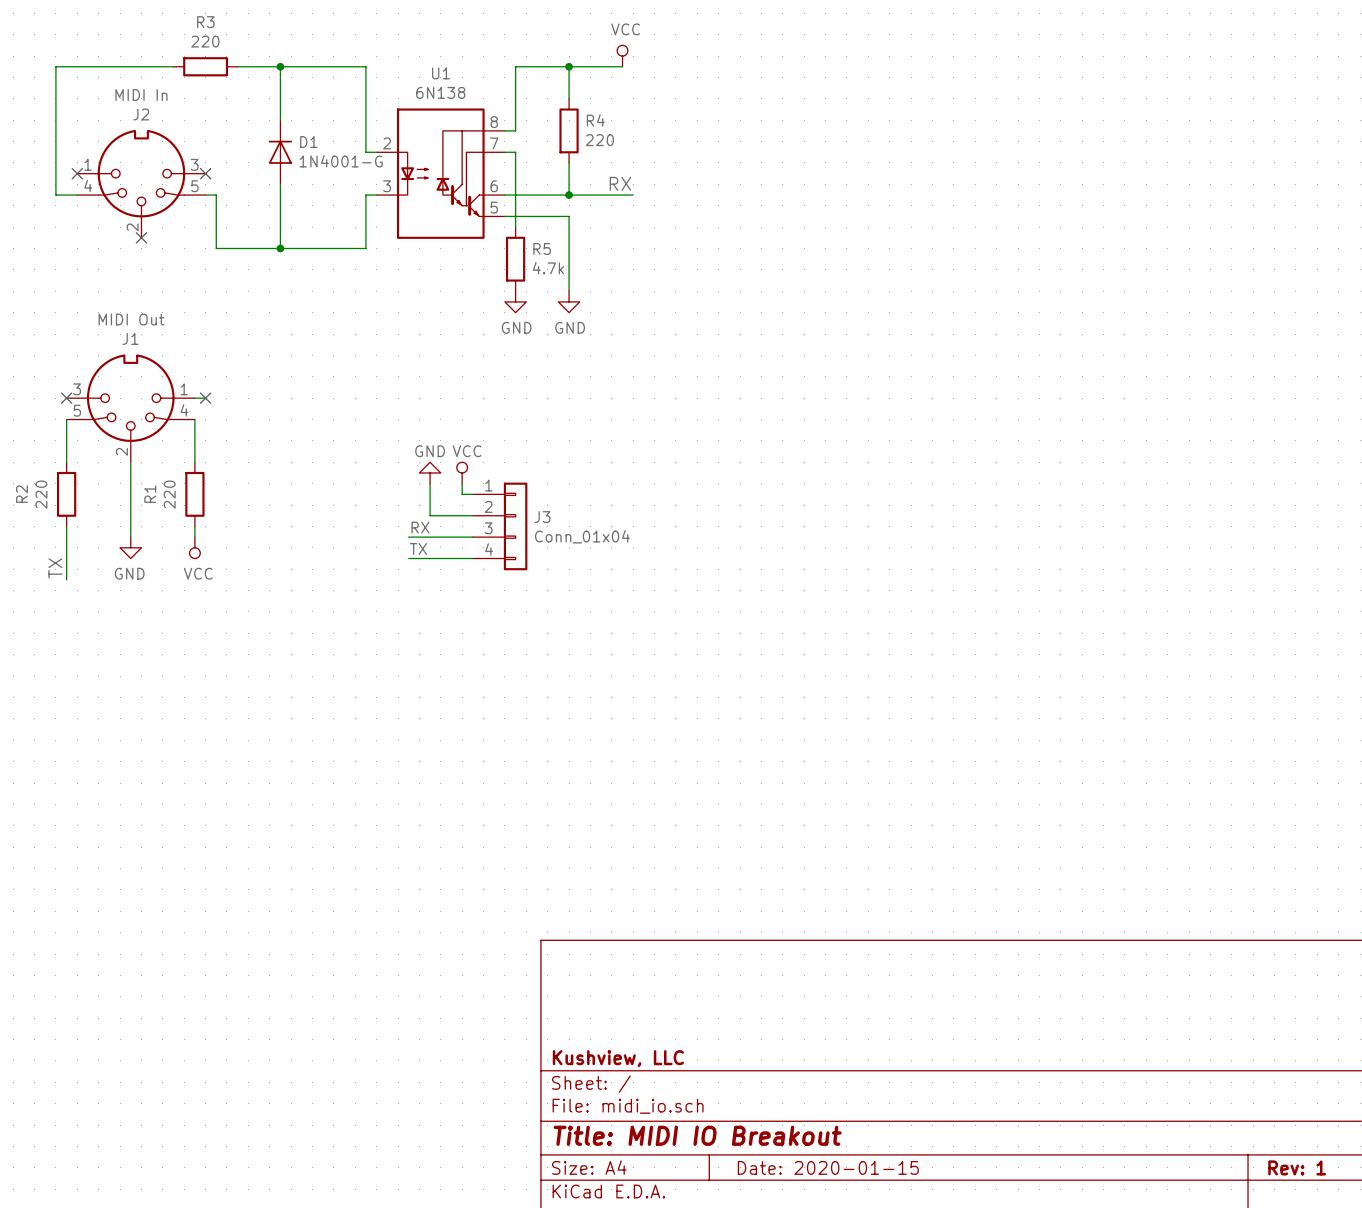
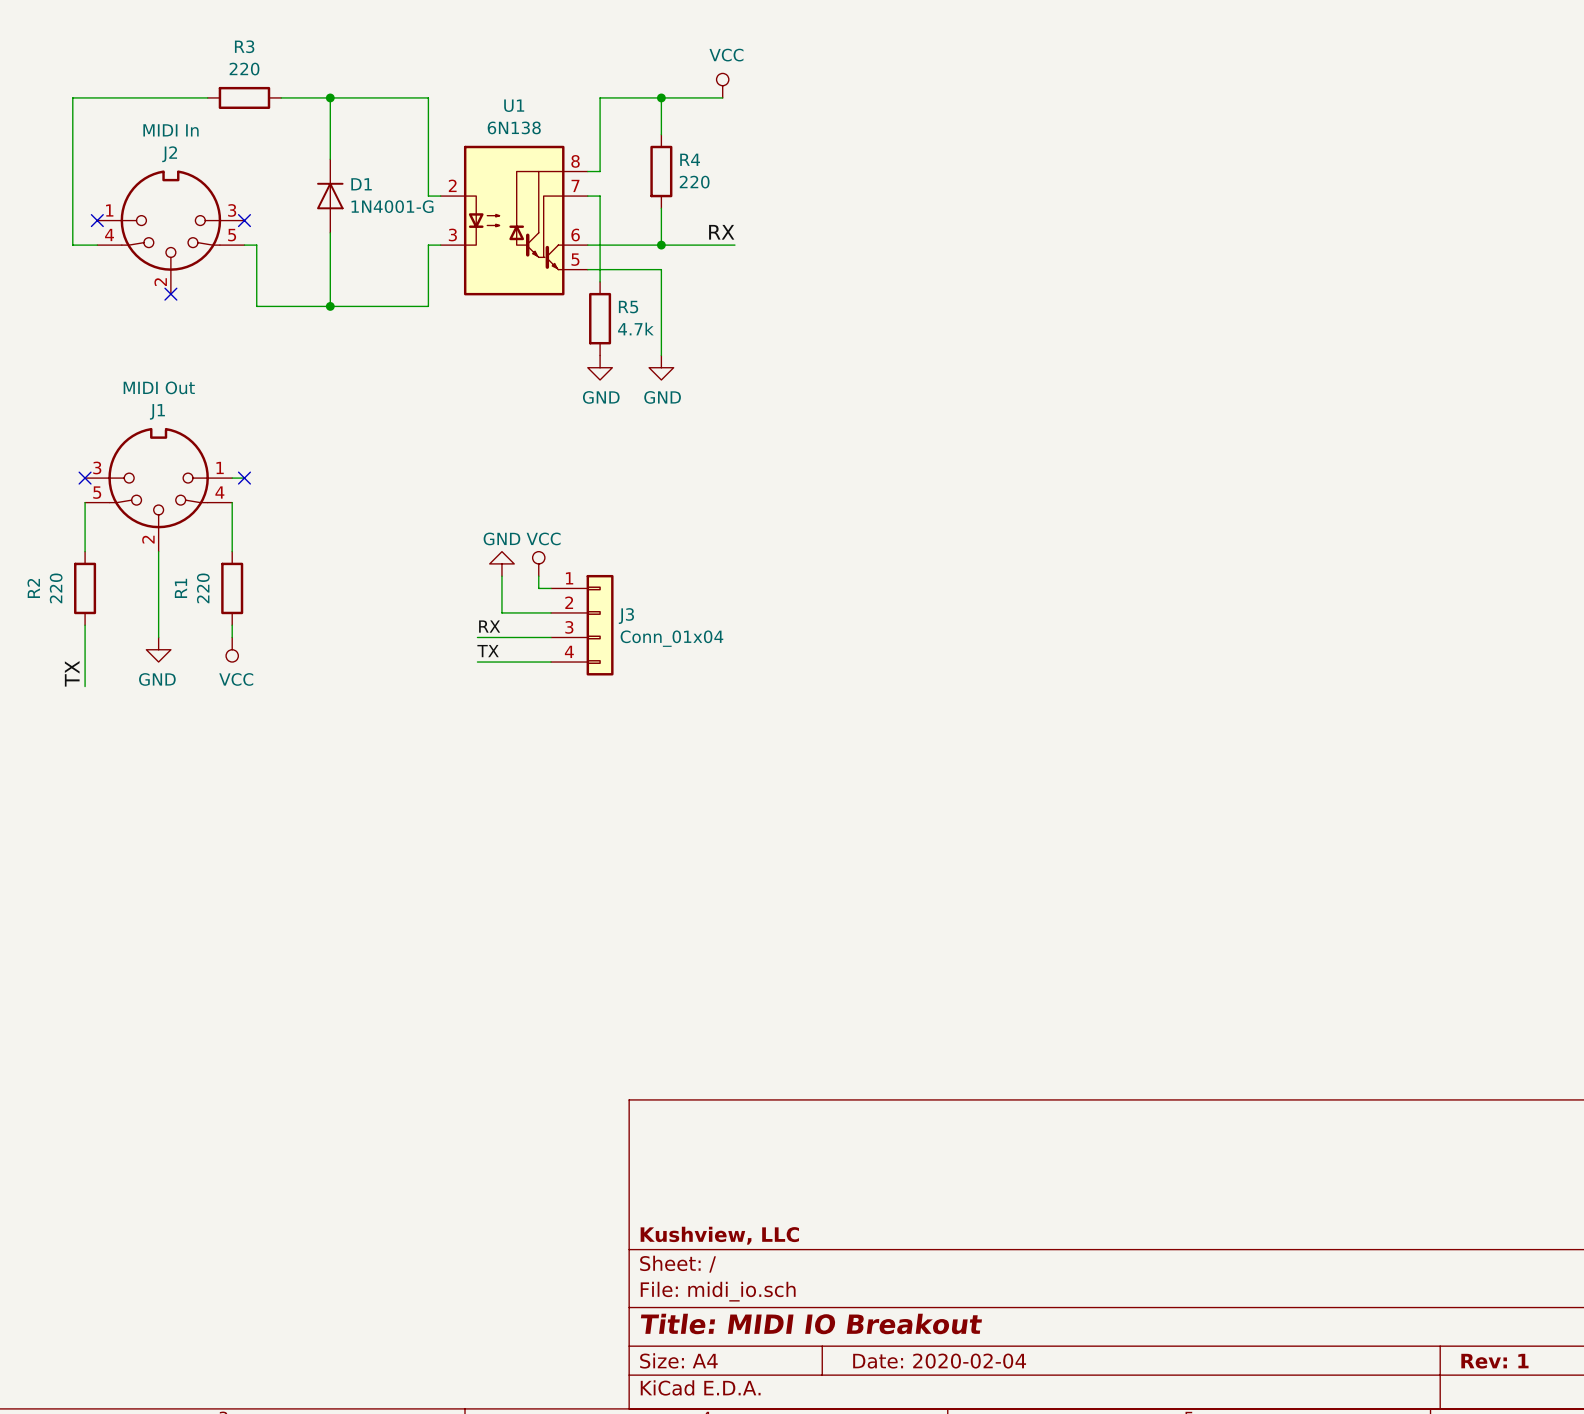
title block: Date: 2020-01-15 (828, 1167) -> Date: 2020-02-04 (939, 1361)

